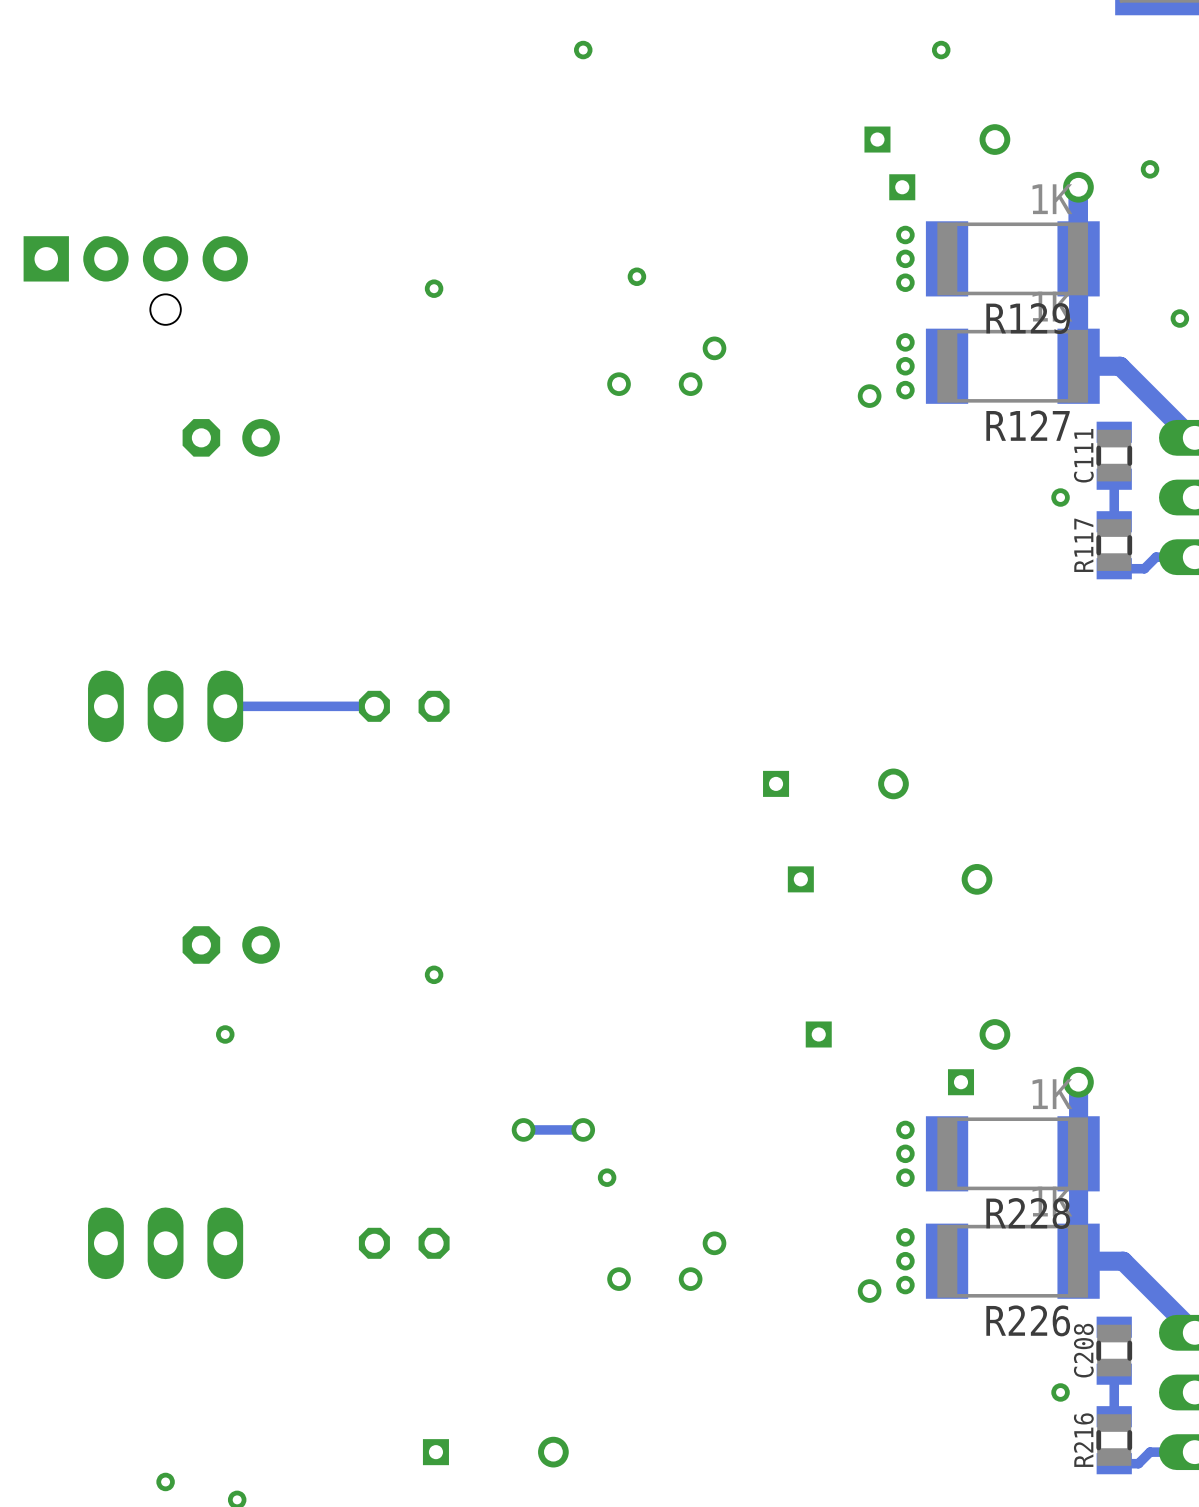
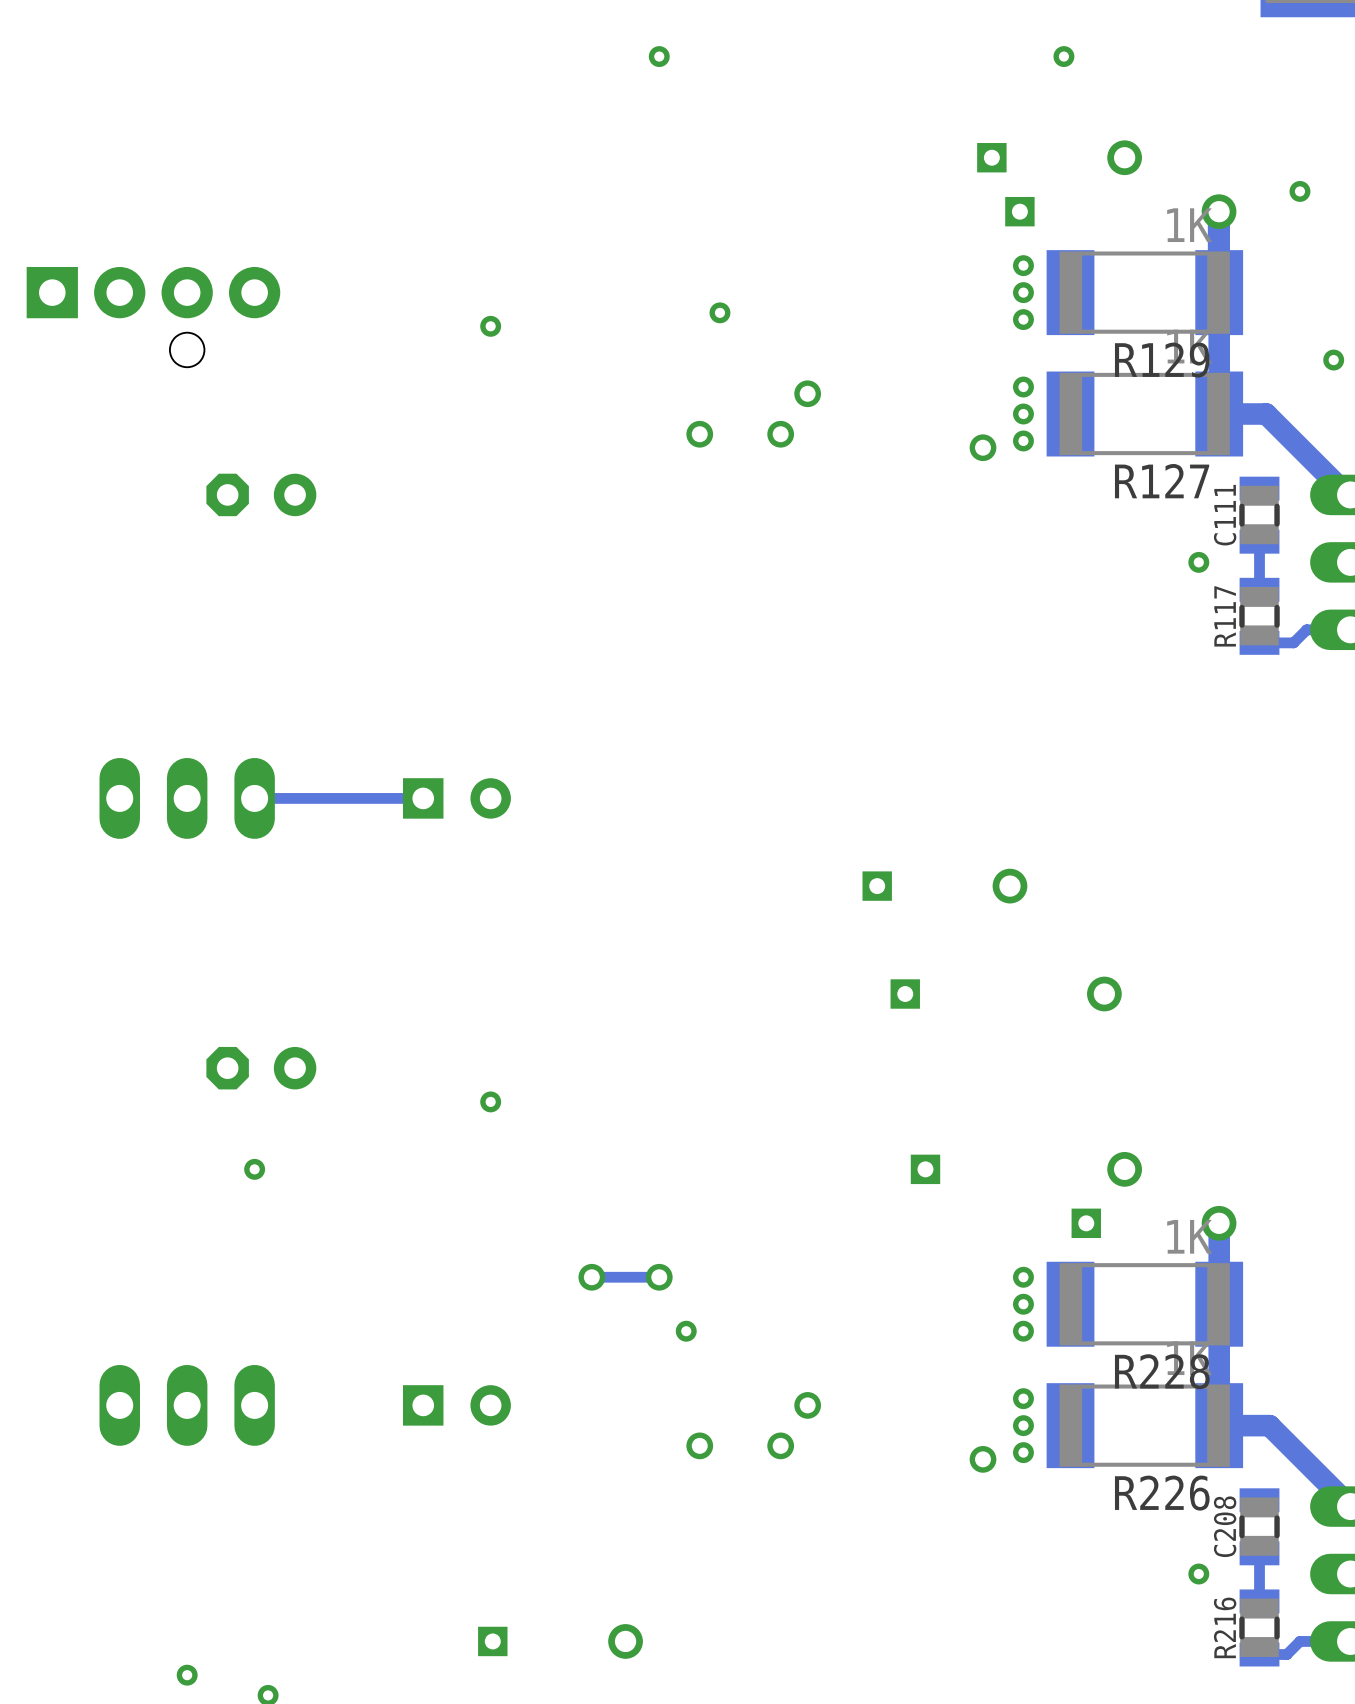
part footprint: [358, 690, 450, 722] -> [402, 778, 511, 819]
part footprint: [358, 1227, 450, 1259] -> [402, 1385, 511, 1426]

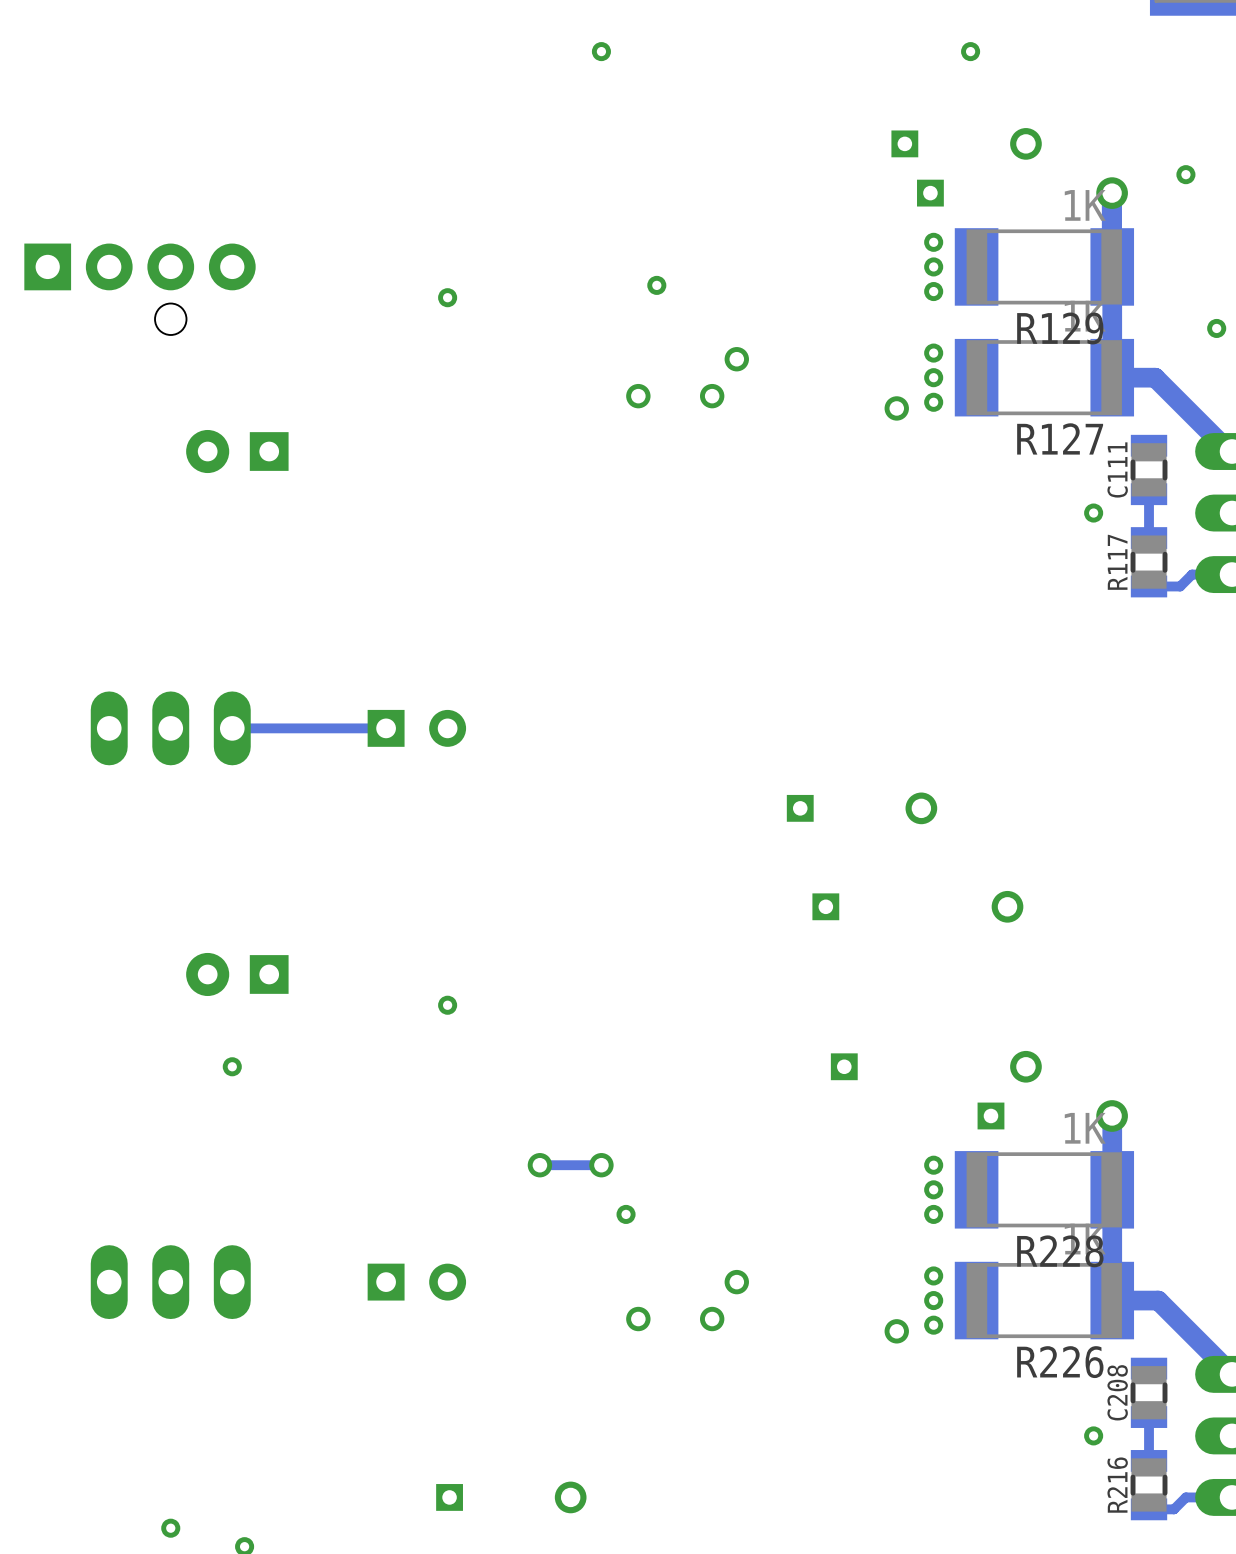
part footprint: [206, 473, 317, 517] -> [186, 429, 289, 474]
part footprint: [206, 1046, 317, 1090] -> [186, 952, 289, 997]

